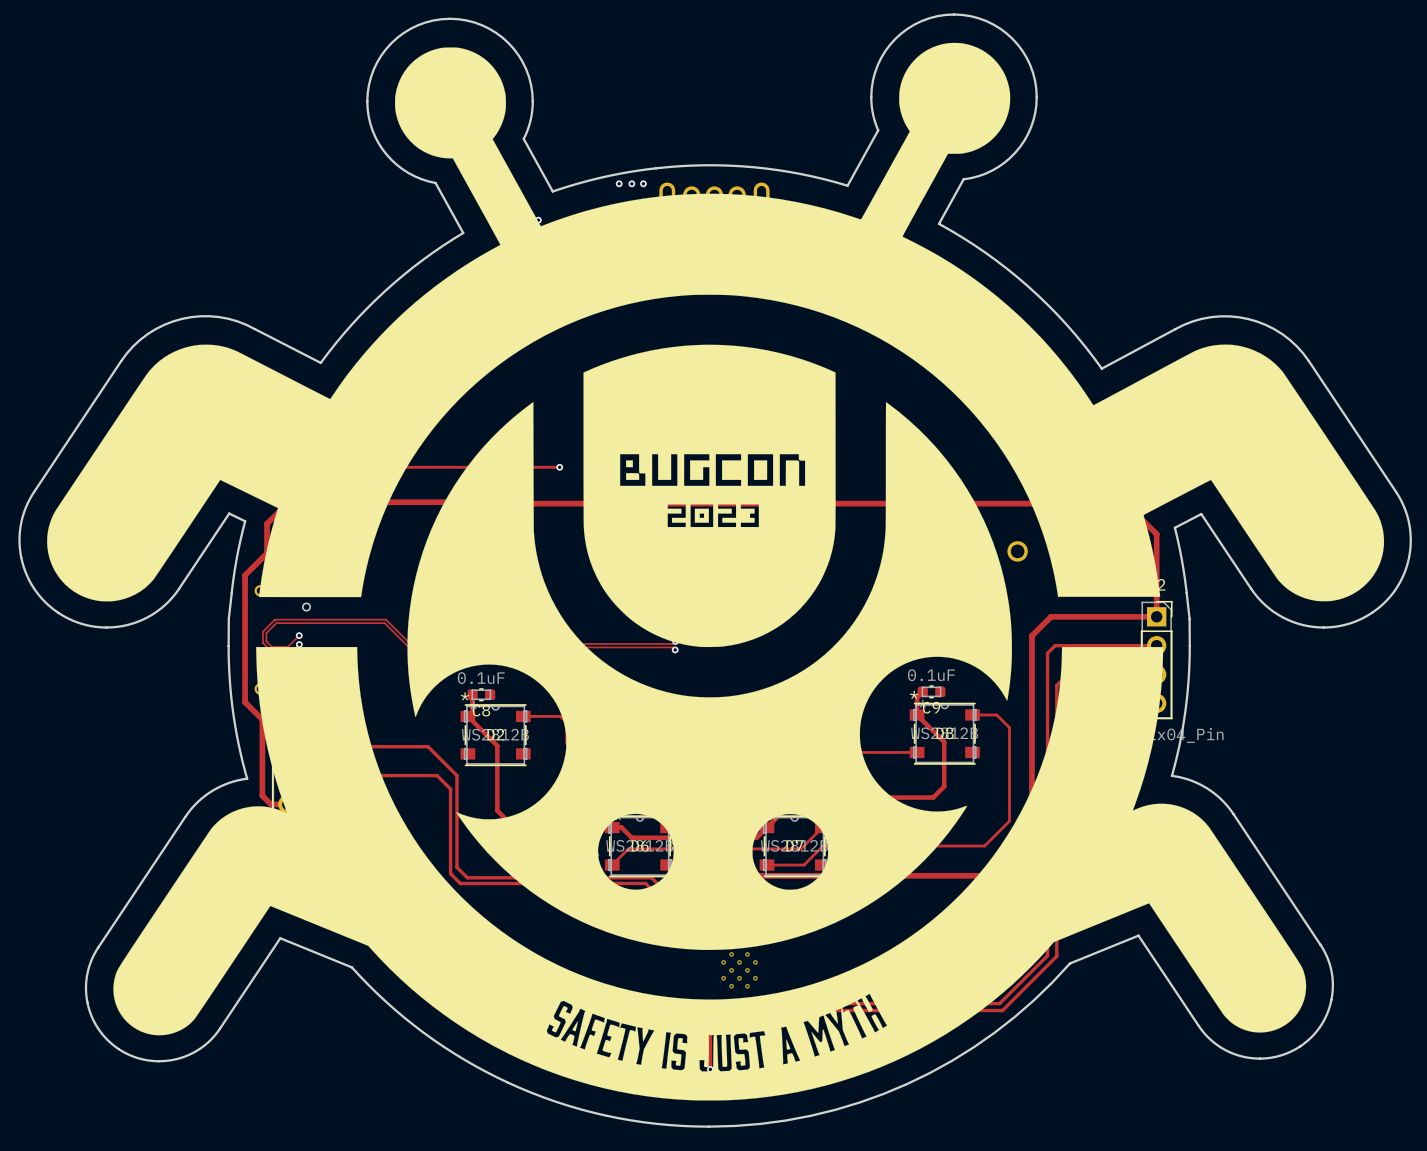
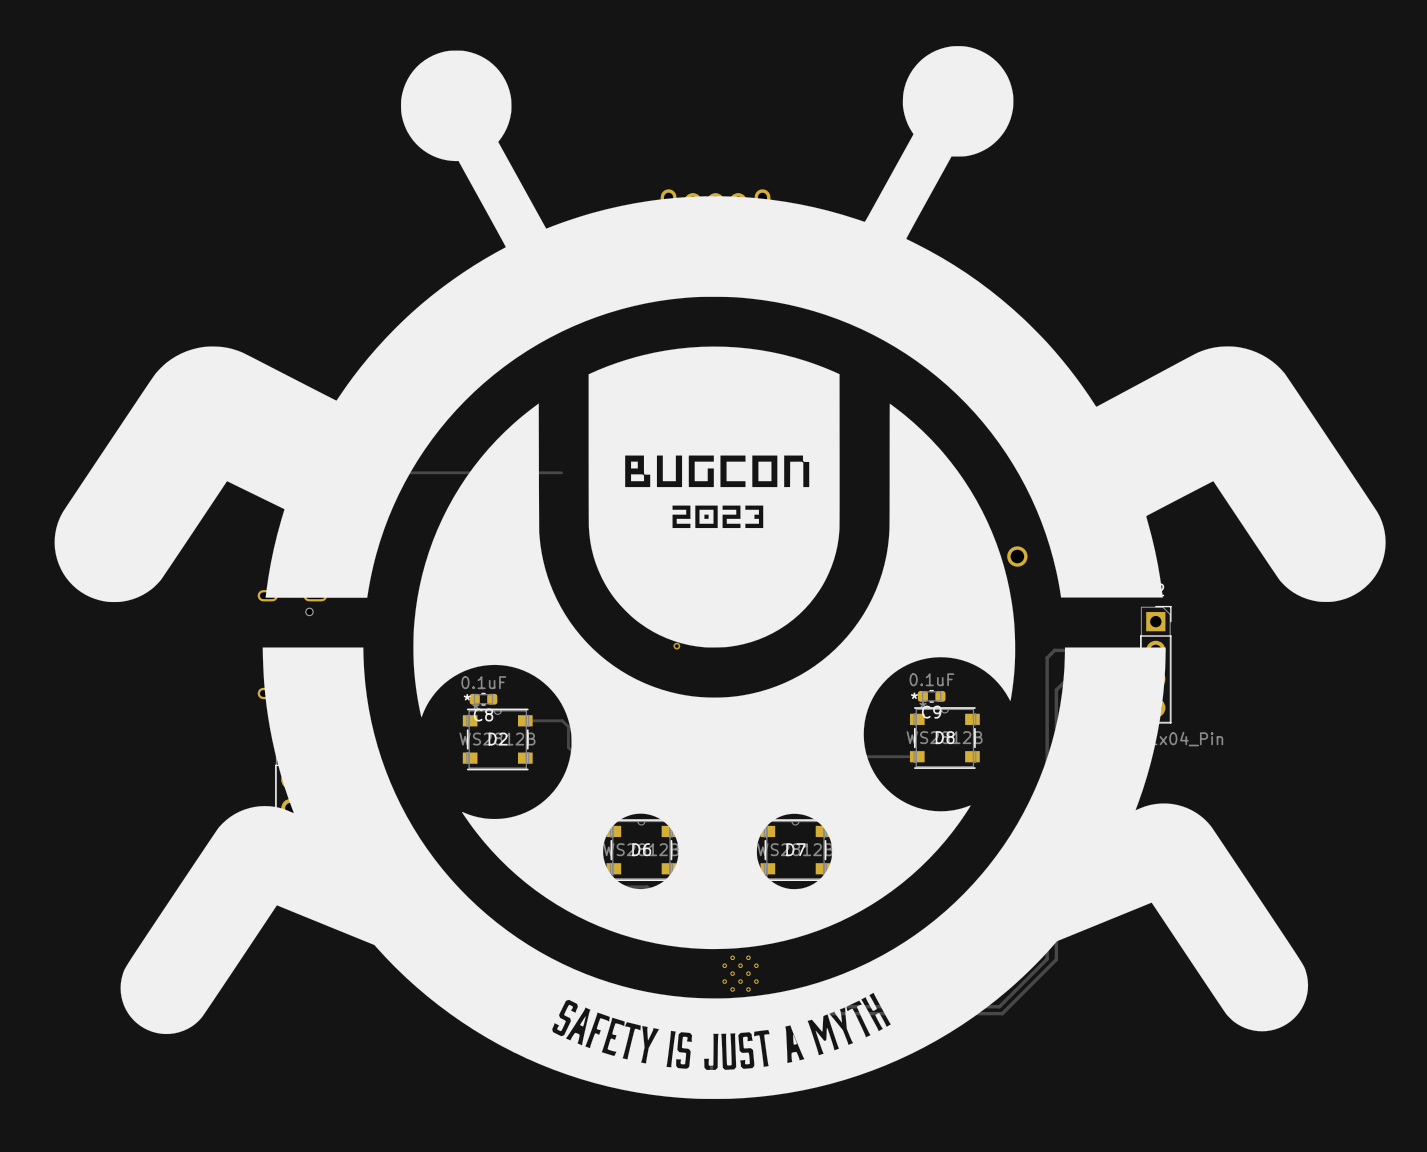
drawing shape: [18, 13, 1412, 1128] -> [54, 46, 1386, 1099]
via: (619, 183) -> none
via: (631, 183) -> none
via: (643, 183) -> none
via: (538, 220) -> none
via: (559, 467) -> none
track: (299, 635) (288, 646) (271, 646) (266, 641) (266, 633) (276, 623) (384, 623) (408, 647) (672, 647) (675, 649) -> none
via: (299, 635) -> none
track: (675, 641) (673, 643) (410, 643) (386, 619) (274, 619) (262, 631) (262, 642) (270, 650) (293, 650) (299, 644) -> none
via: (299, 644) -> none
via: (675, 649) -> none
track: (922, 691) (917, 697) (917, 714) (944, 742) (944, 786) (933, 797) (797, 797) (756, 837) (631, 837) (621, 827) (514, 827) (497, 810) (497, 745) (467, 716) (472, 711) (472, 694) -> none
track: (972, 714) (996, 714) (1009, 727) (1009, 821) (984, 846) (823, 846) (804, 865) (766, 865) -> none
track: (287, 746) (428, 746) (456, 775) (456, 867) (467, 877) (651, 877) (668, 894) (709, 894) (723, 908) (836, 908) -> none
track: (287, 775) (437, 775) (450, 789) (450, 873) (460, 883) (544, 883) -> none
track: (287, 804) (271, 804) (262, 795) (262, 719) (245, 702) (245, 575) (267, 553) (267, 523) (288, 502) (1126, 503) (1156, 534) (1156, 616) (1051, 616) (1031, 635) (1031, 846) (1002, 875) (755, 875) (742, 862) (742, 857) -> none
track: (822, 827) (801, 848) (628, 848) (612, 865) -> none
via: (710, 1069) -> none

